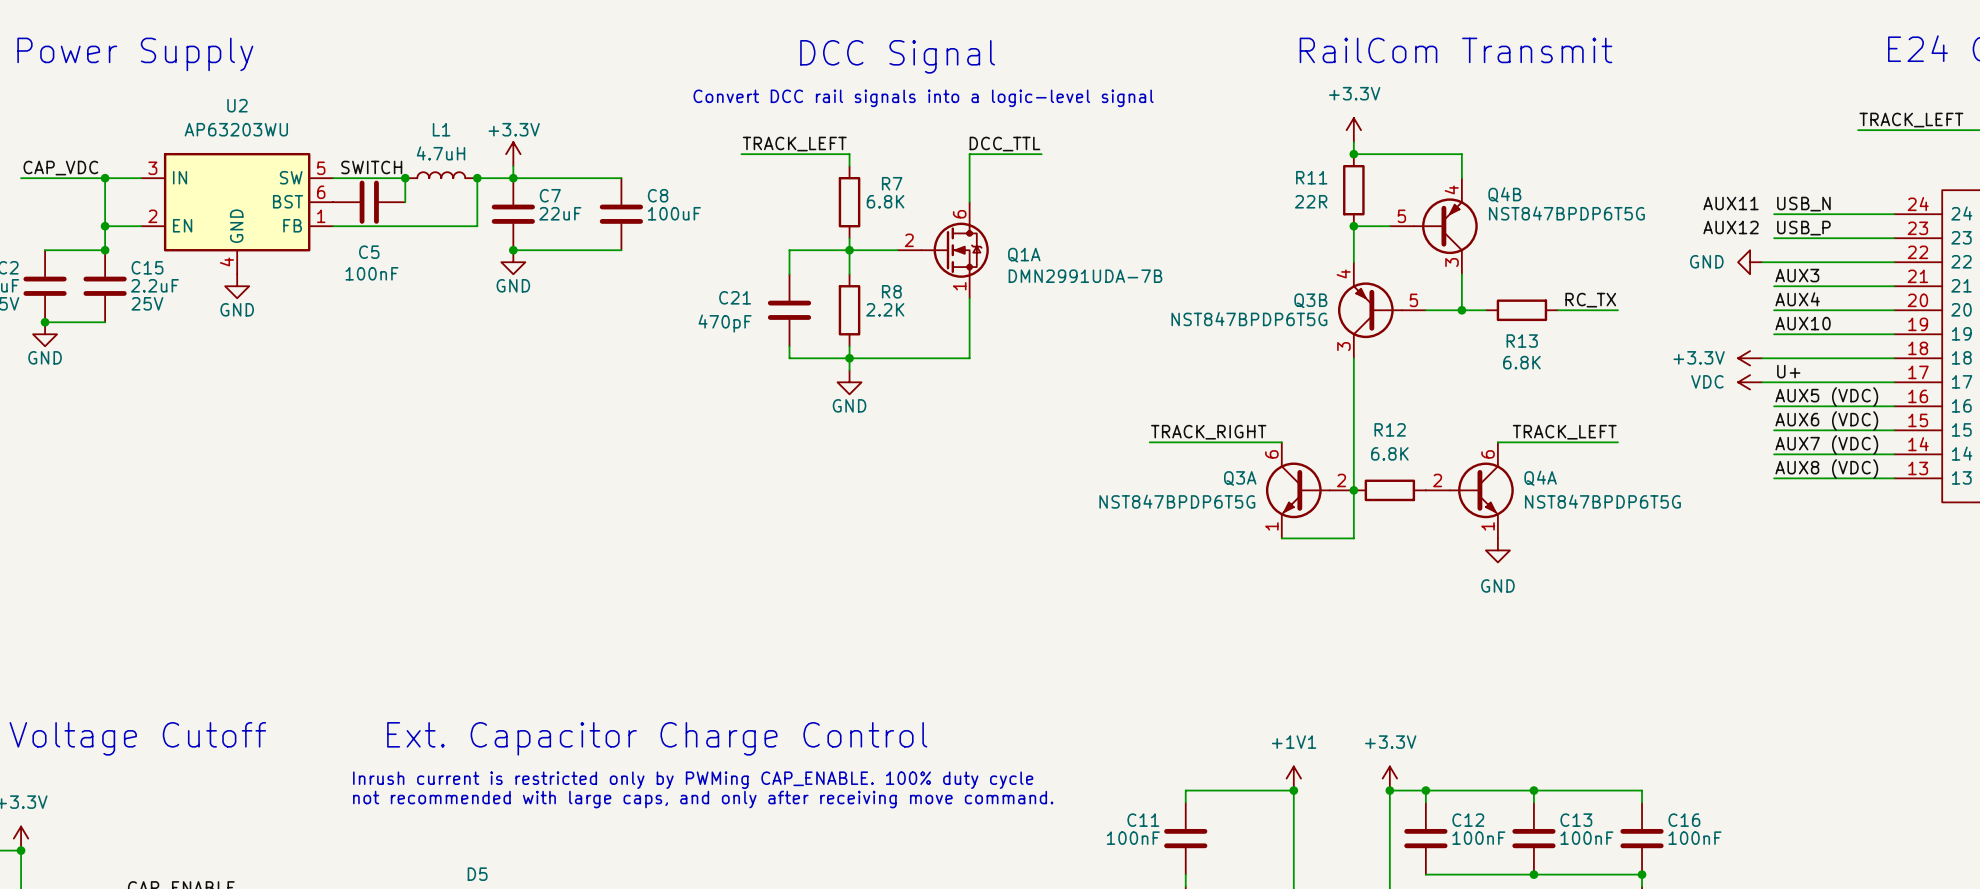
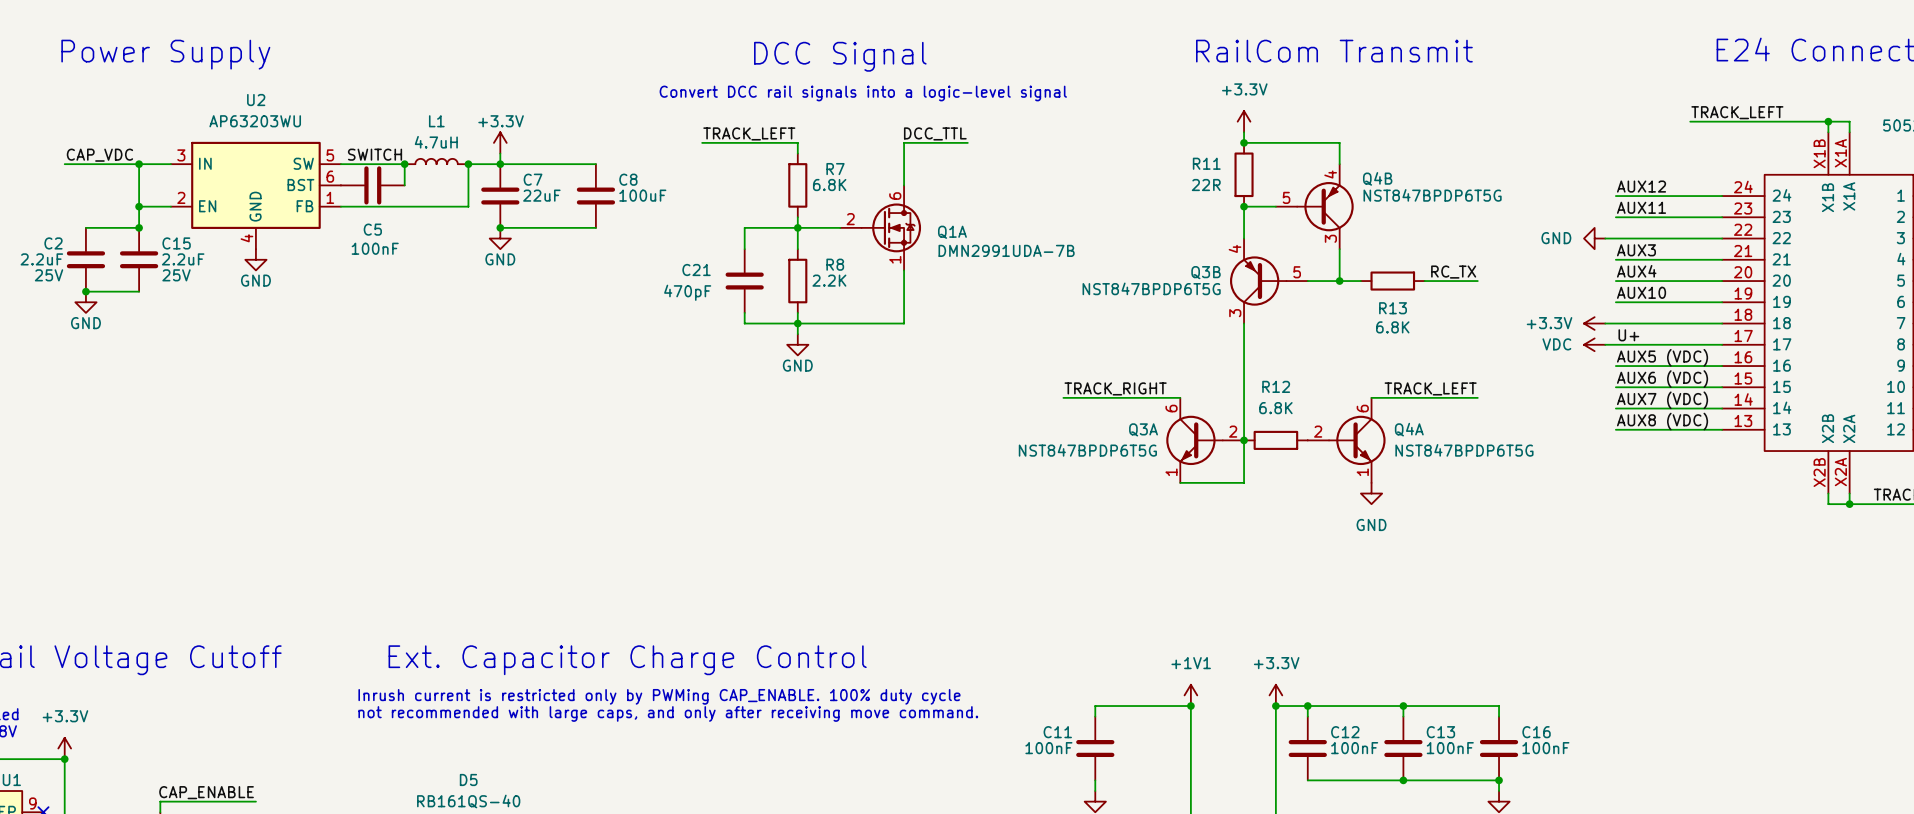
label: AUX11 (1731, 203) -> none
label: USB_N (1803, 204) -> AUX12 (1641, 186)
label: AUX12 (1731, 227) -> none
label: USB_P (1803, 228) -> AUX11 (1641, 207)

